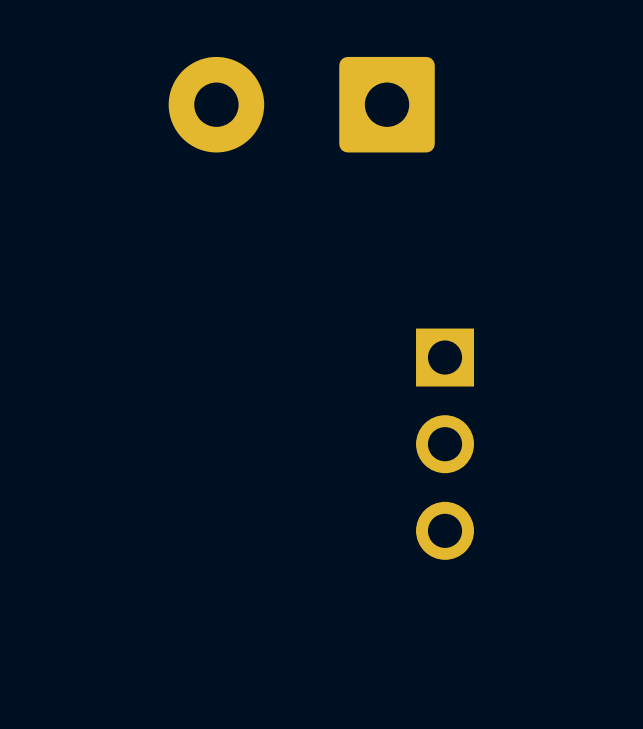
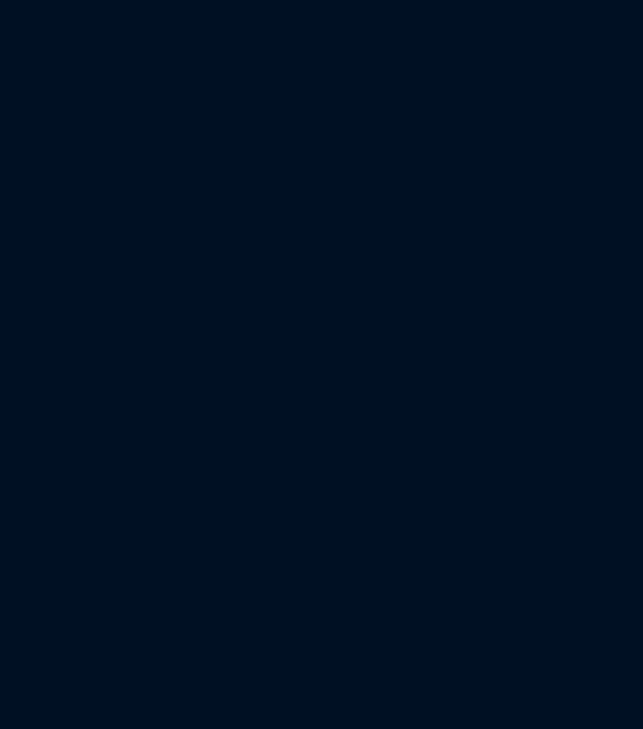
part: (301, 104) -> none
part: (445, 444) -> none

